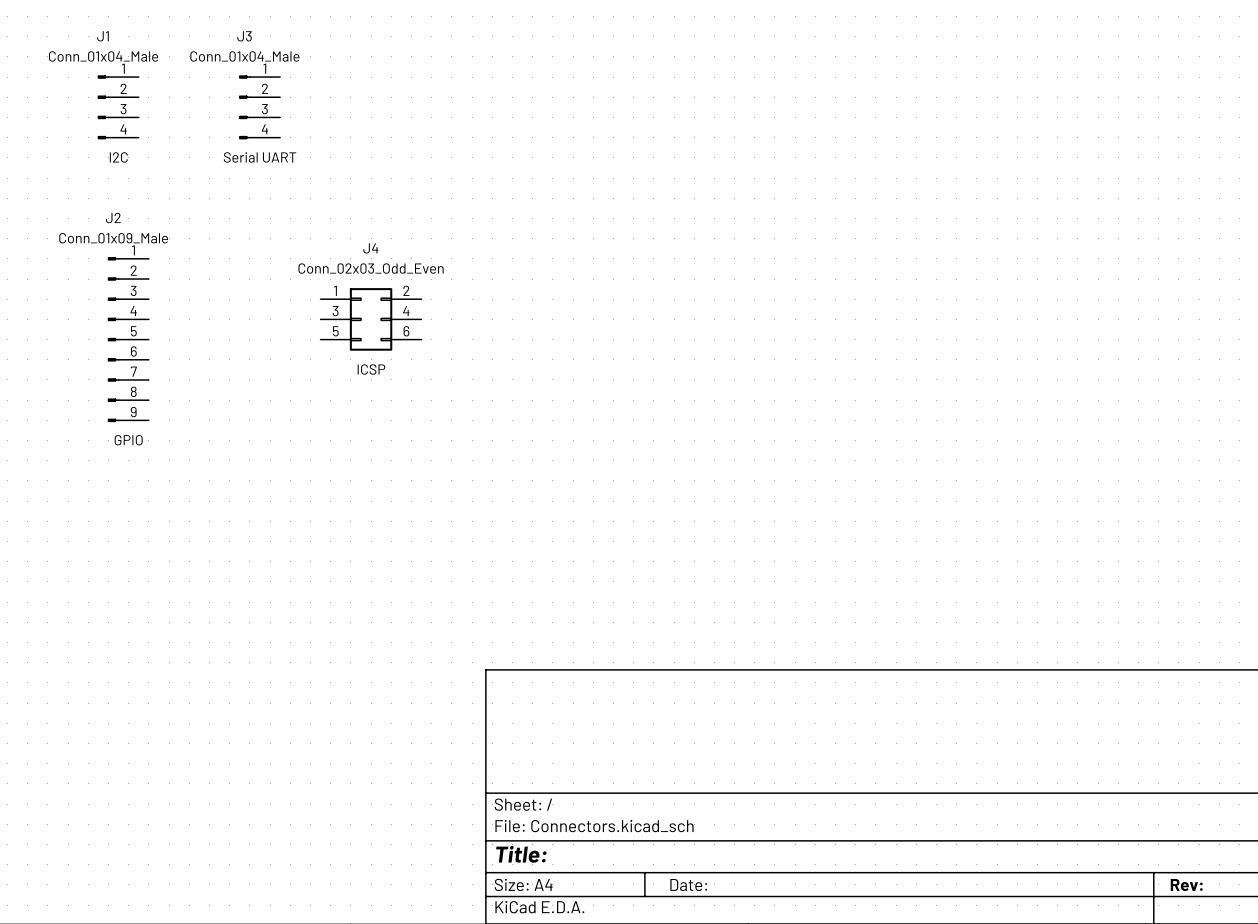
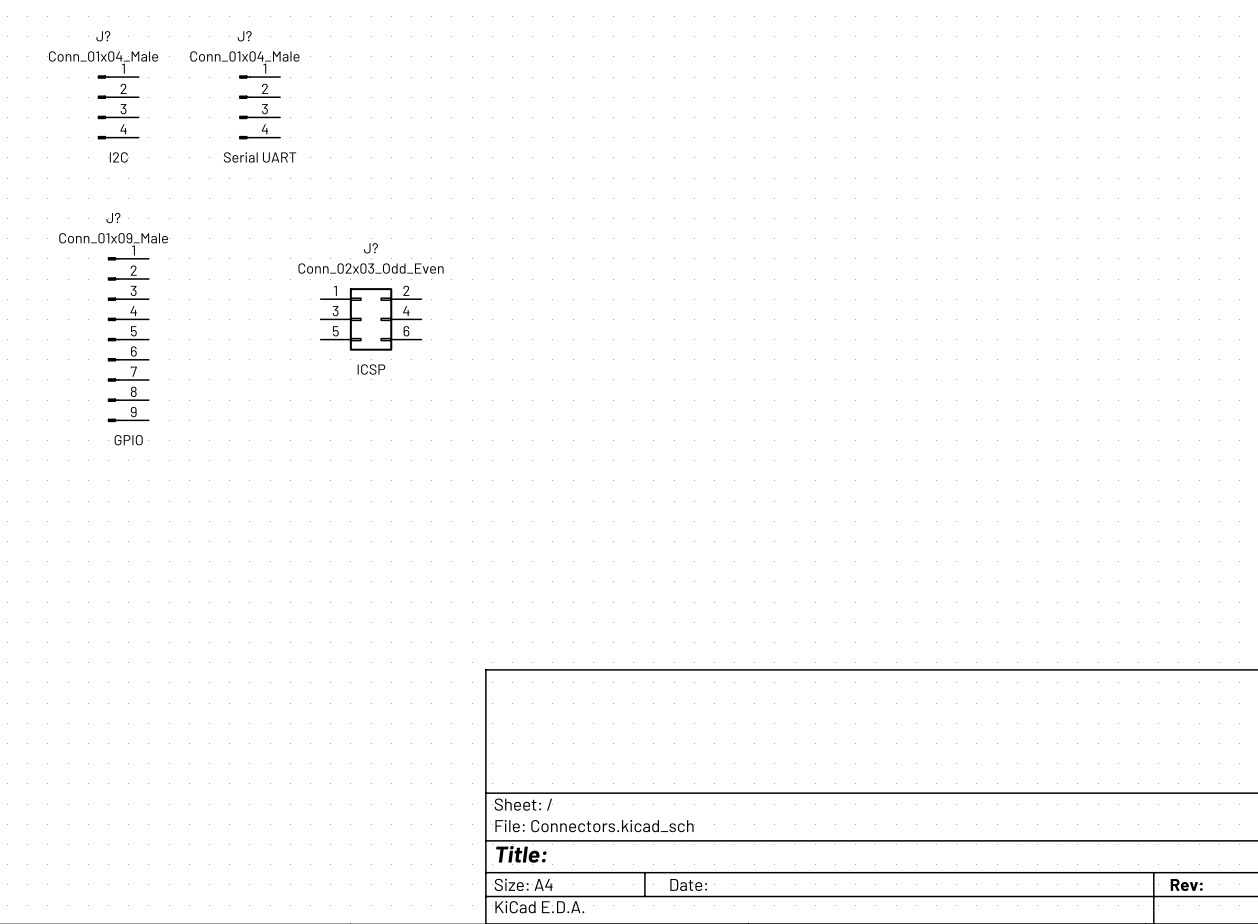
J1 name: J1 (102, 36) -> J? (103, 36)
J3 name: J3 (244, 36) -> J? (244, 36)
J2 name: J2 (113, 218) -> J? (113, 218)
J4 name: J4 (370, 248) -> J? (370, 248)

